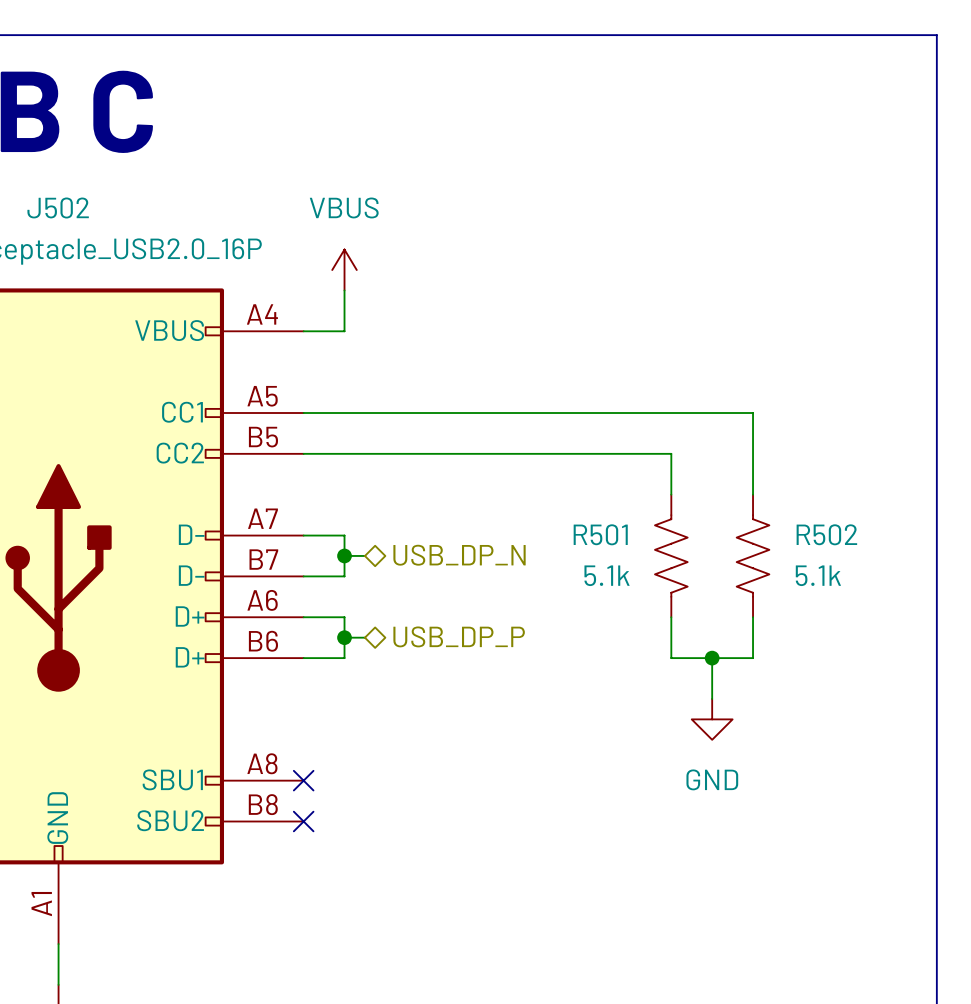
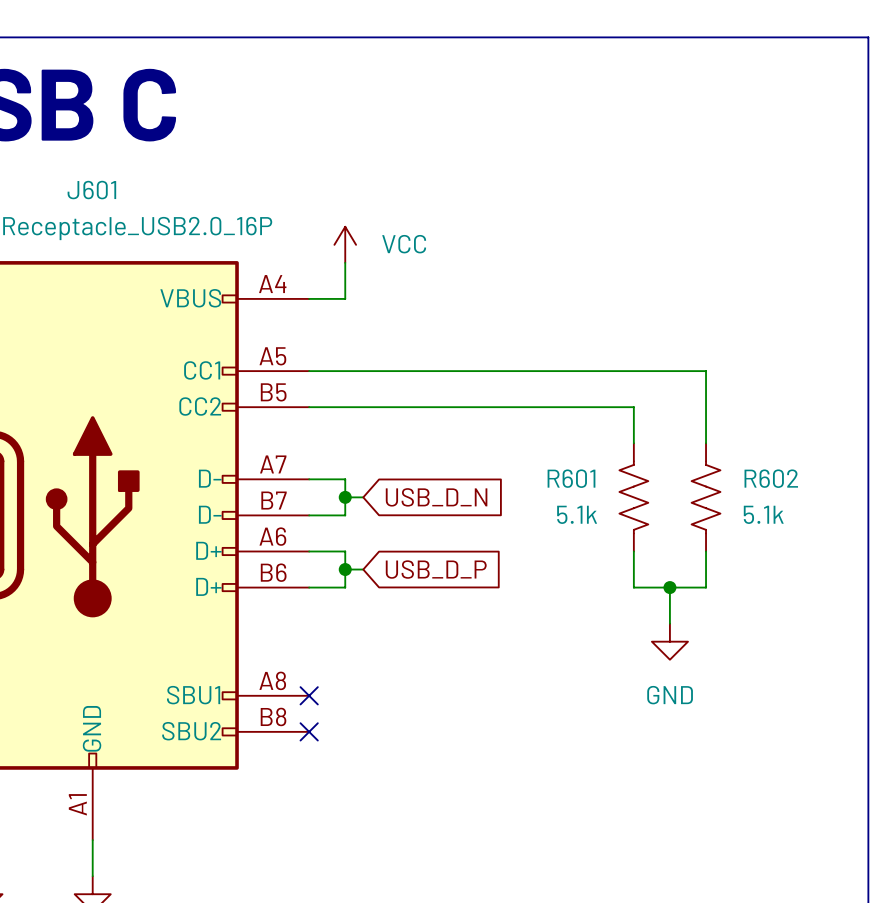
J502 name: J502 (58, 207) -> J601 (91, 190)
power symbol: VBUS (344, 270) -> VCC (345, 244)
R501 name: R501 (600, 534) -> R601 (571, 478)
R502 name: R502 (826, 534) -> R602 (771, 478)
global label: none -> USB_D_N (436, 497)
hierarchical label: USB_DP_N (459, 555) -> none
hierarchical label: USB_DP_P (459, 636) -> none
global label: none -> USB_D_P (436, 569)

